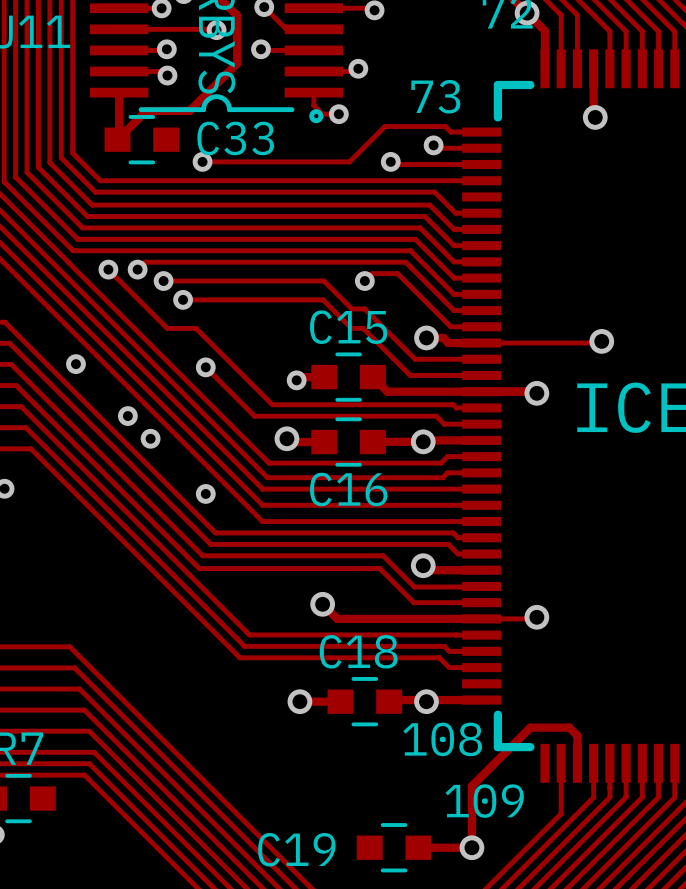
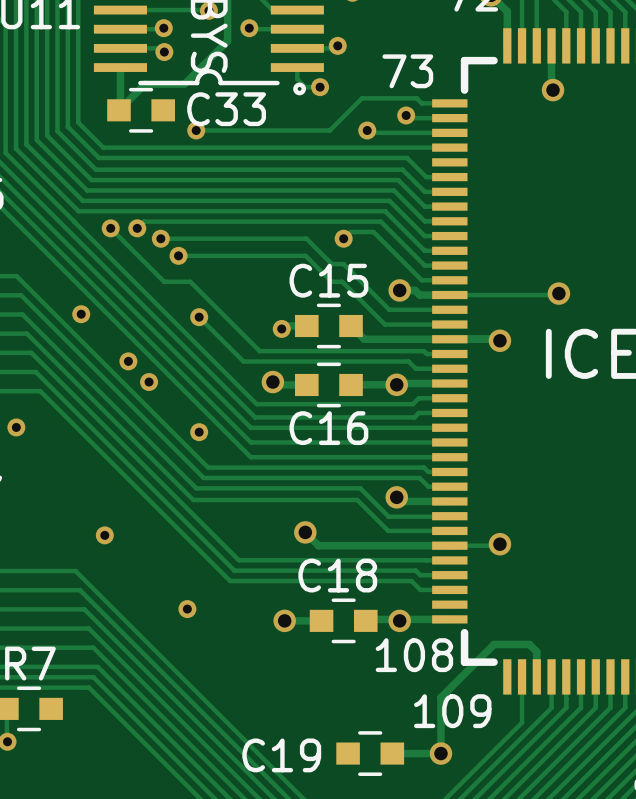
via: none -> (104, 535)
via: none -> (187, 609)

